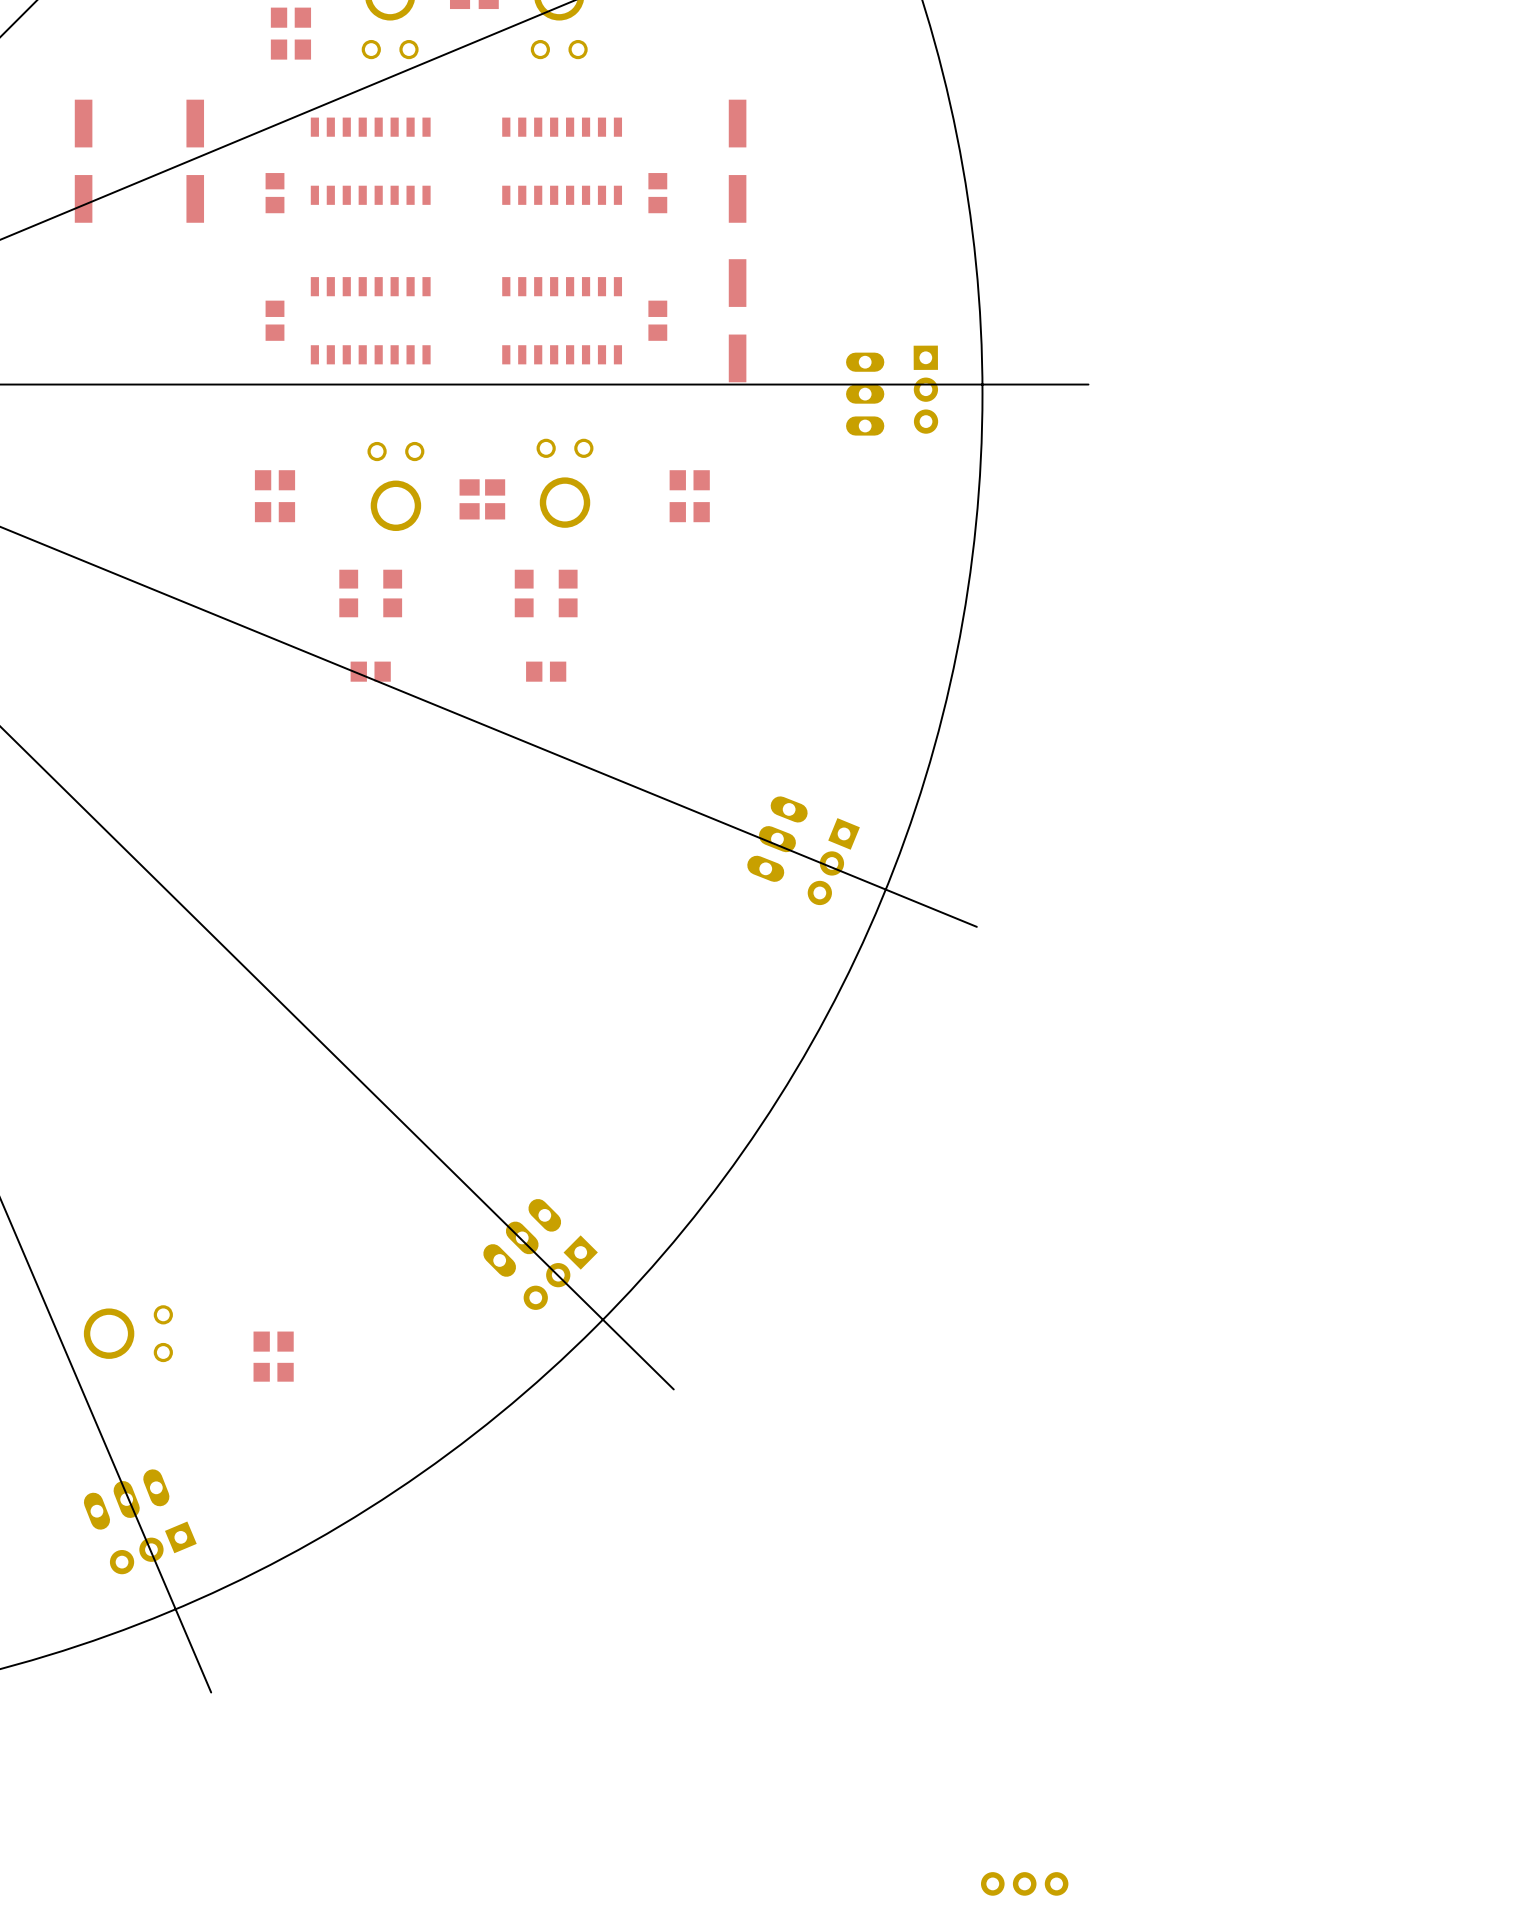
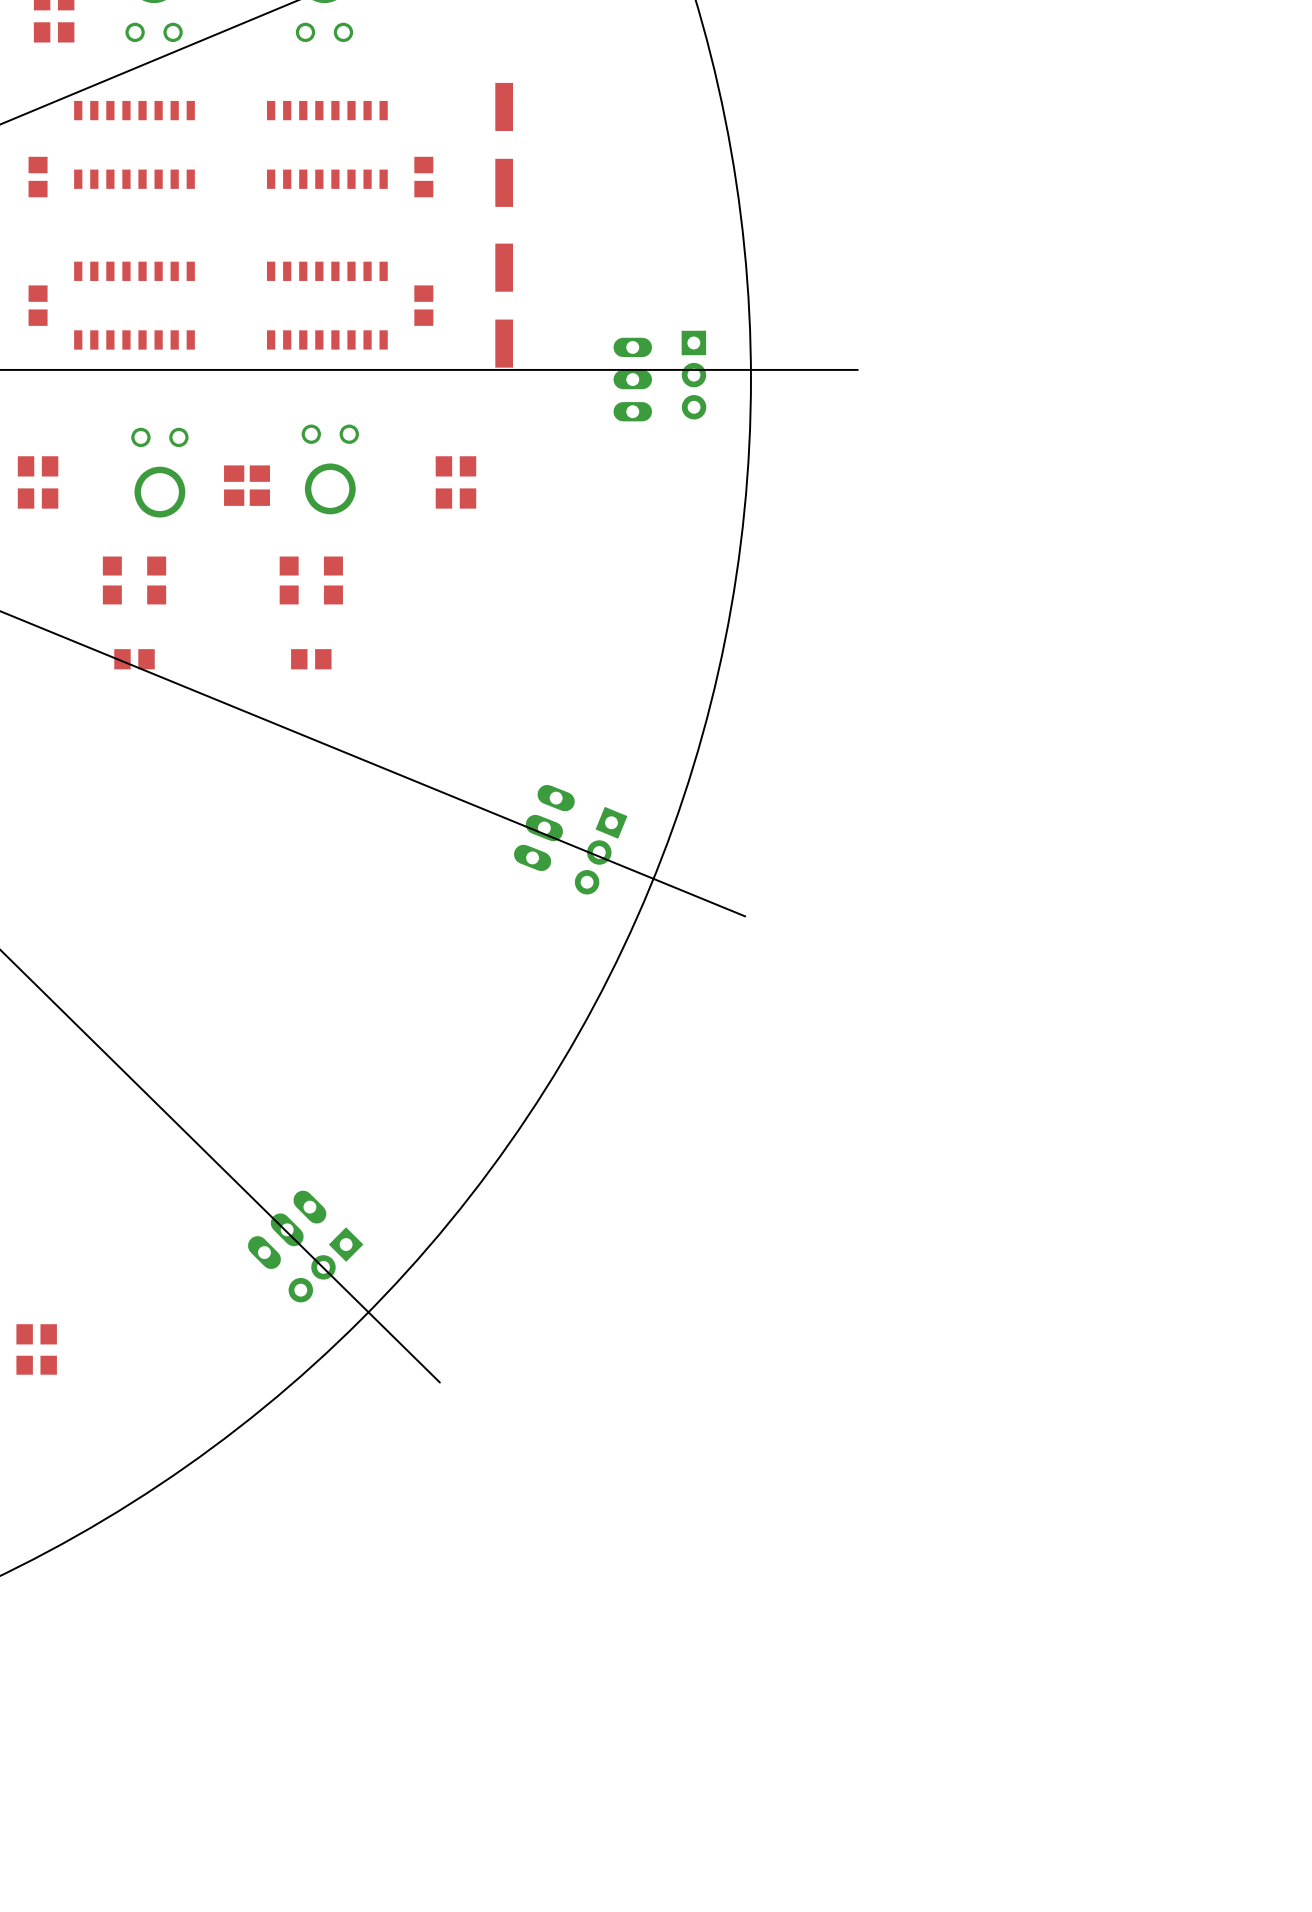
part: (1024, 1883) -> none

